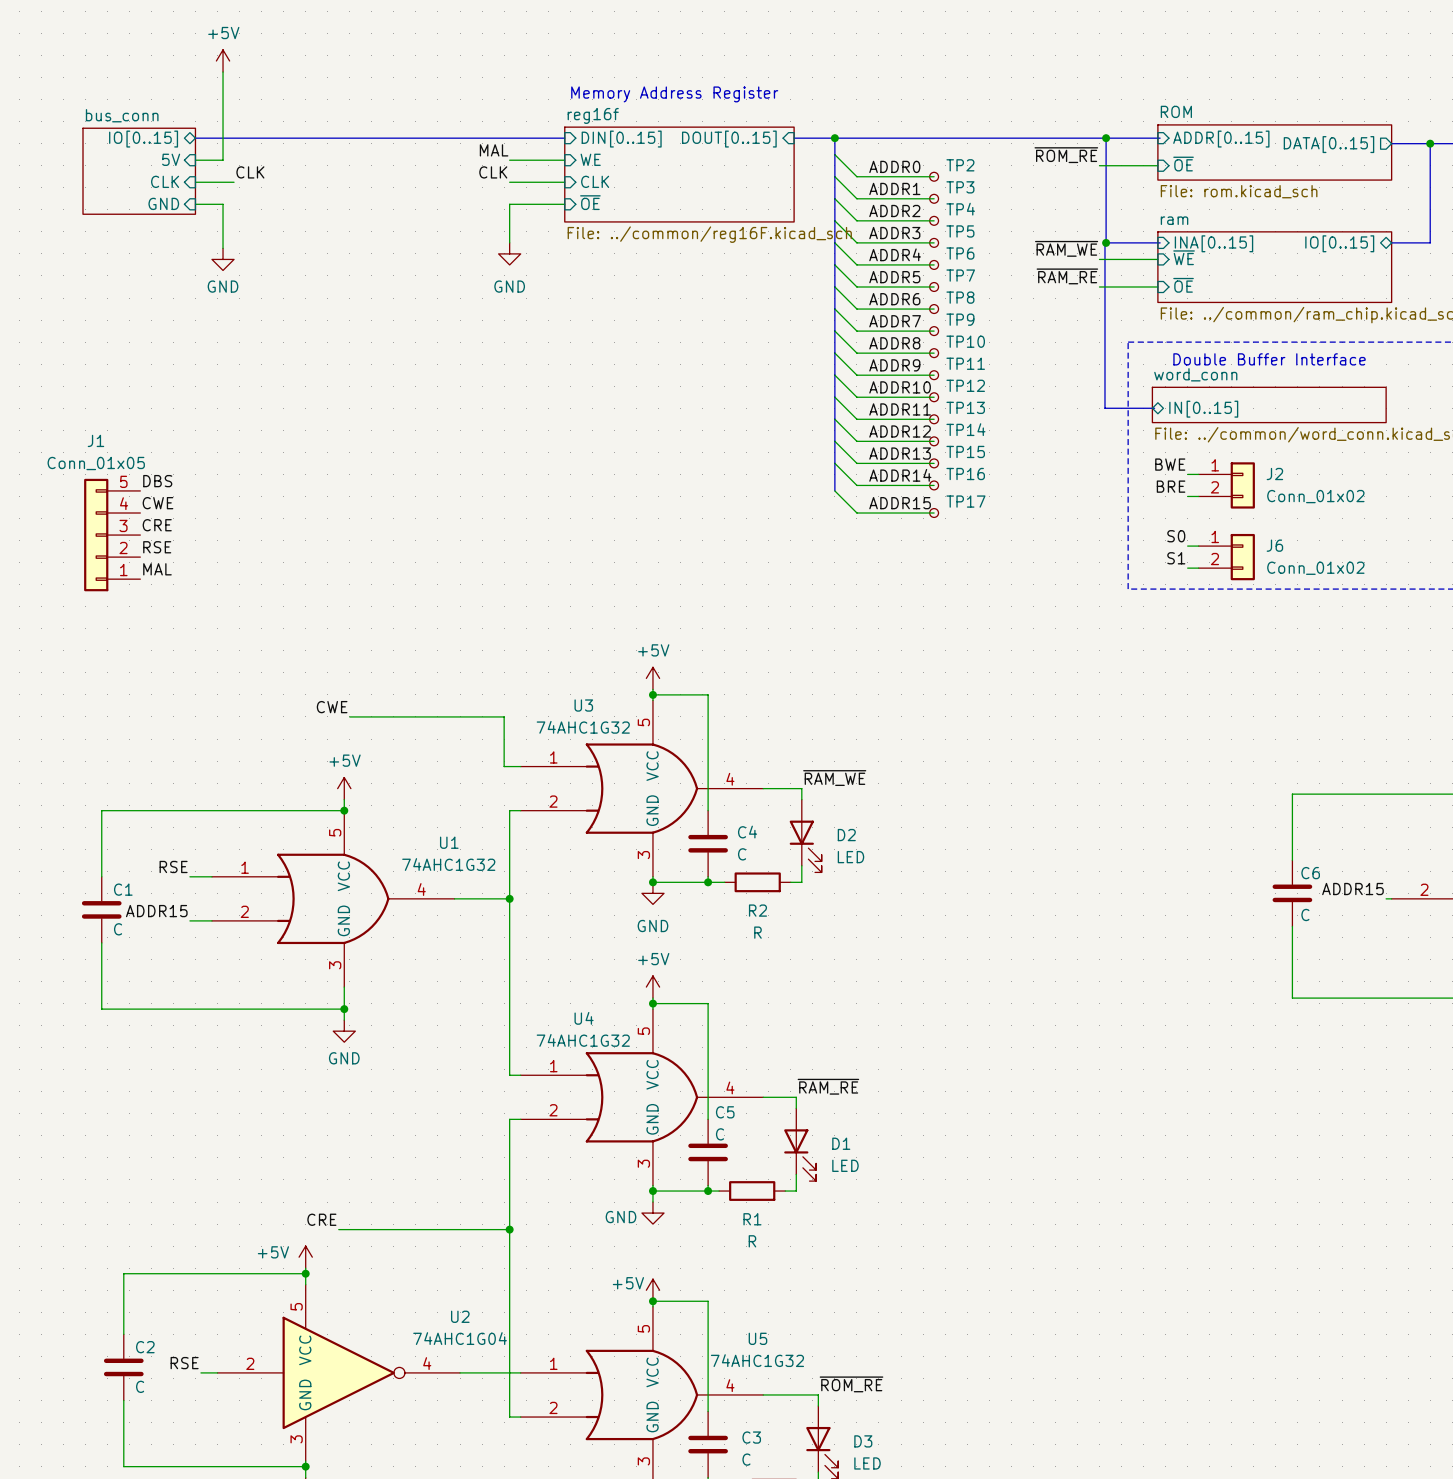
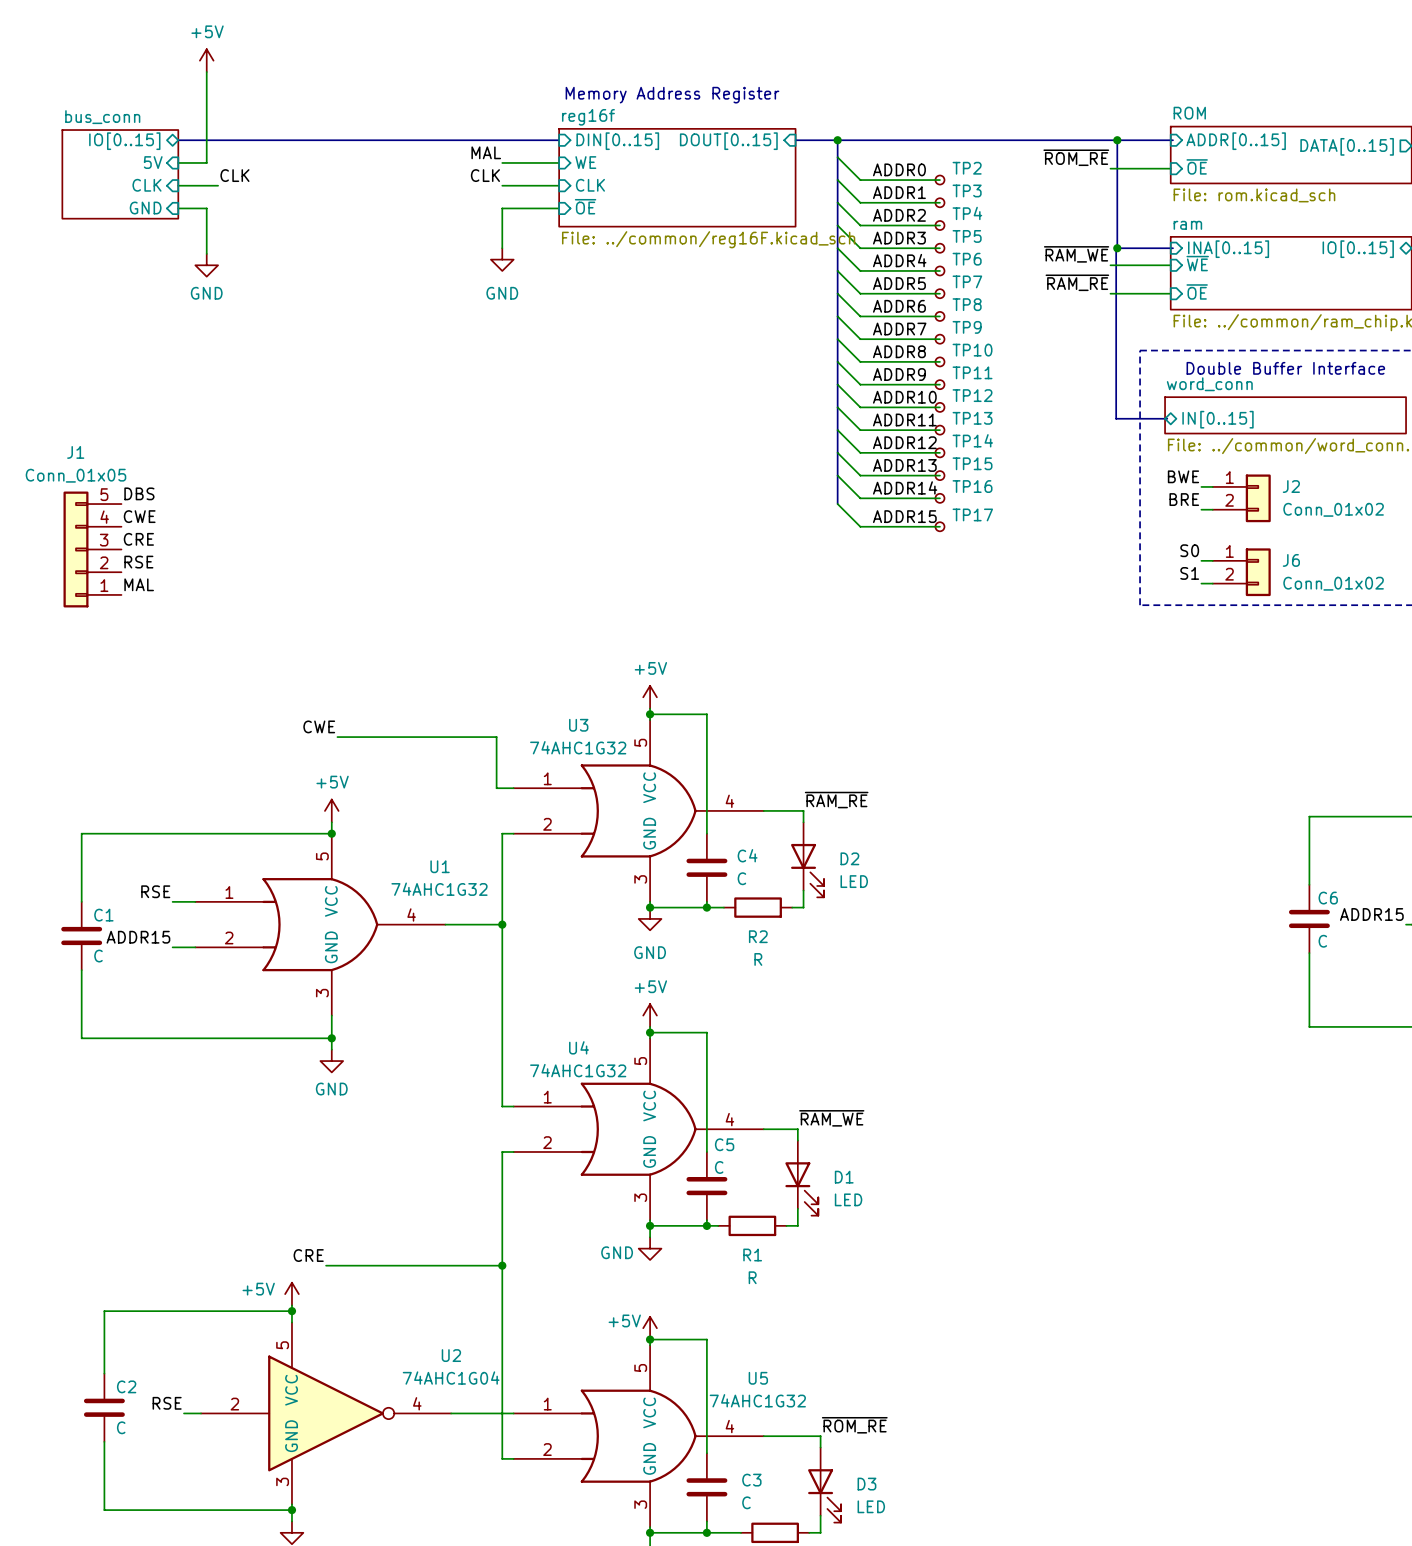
label: ~{RAM_WE} (834, 778) -> ~{RAM_RE} (836, 800)
label: ~{RAM_RE} (828, 1086) -> ~{RAM_WE} (831, 1118)

